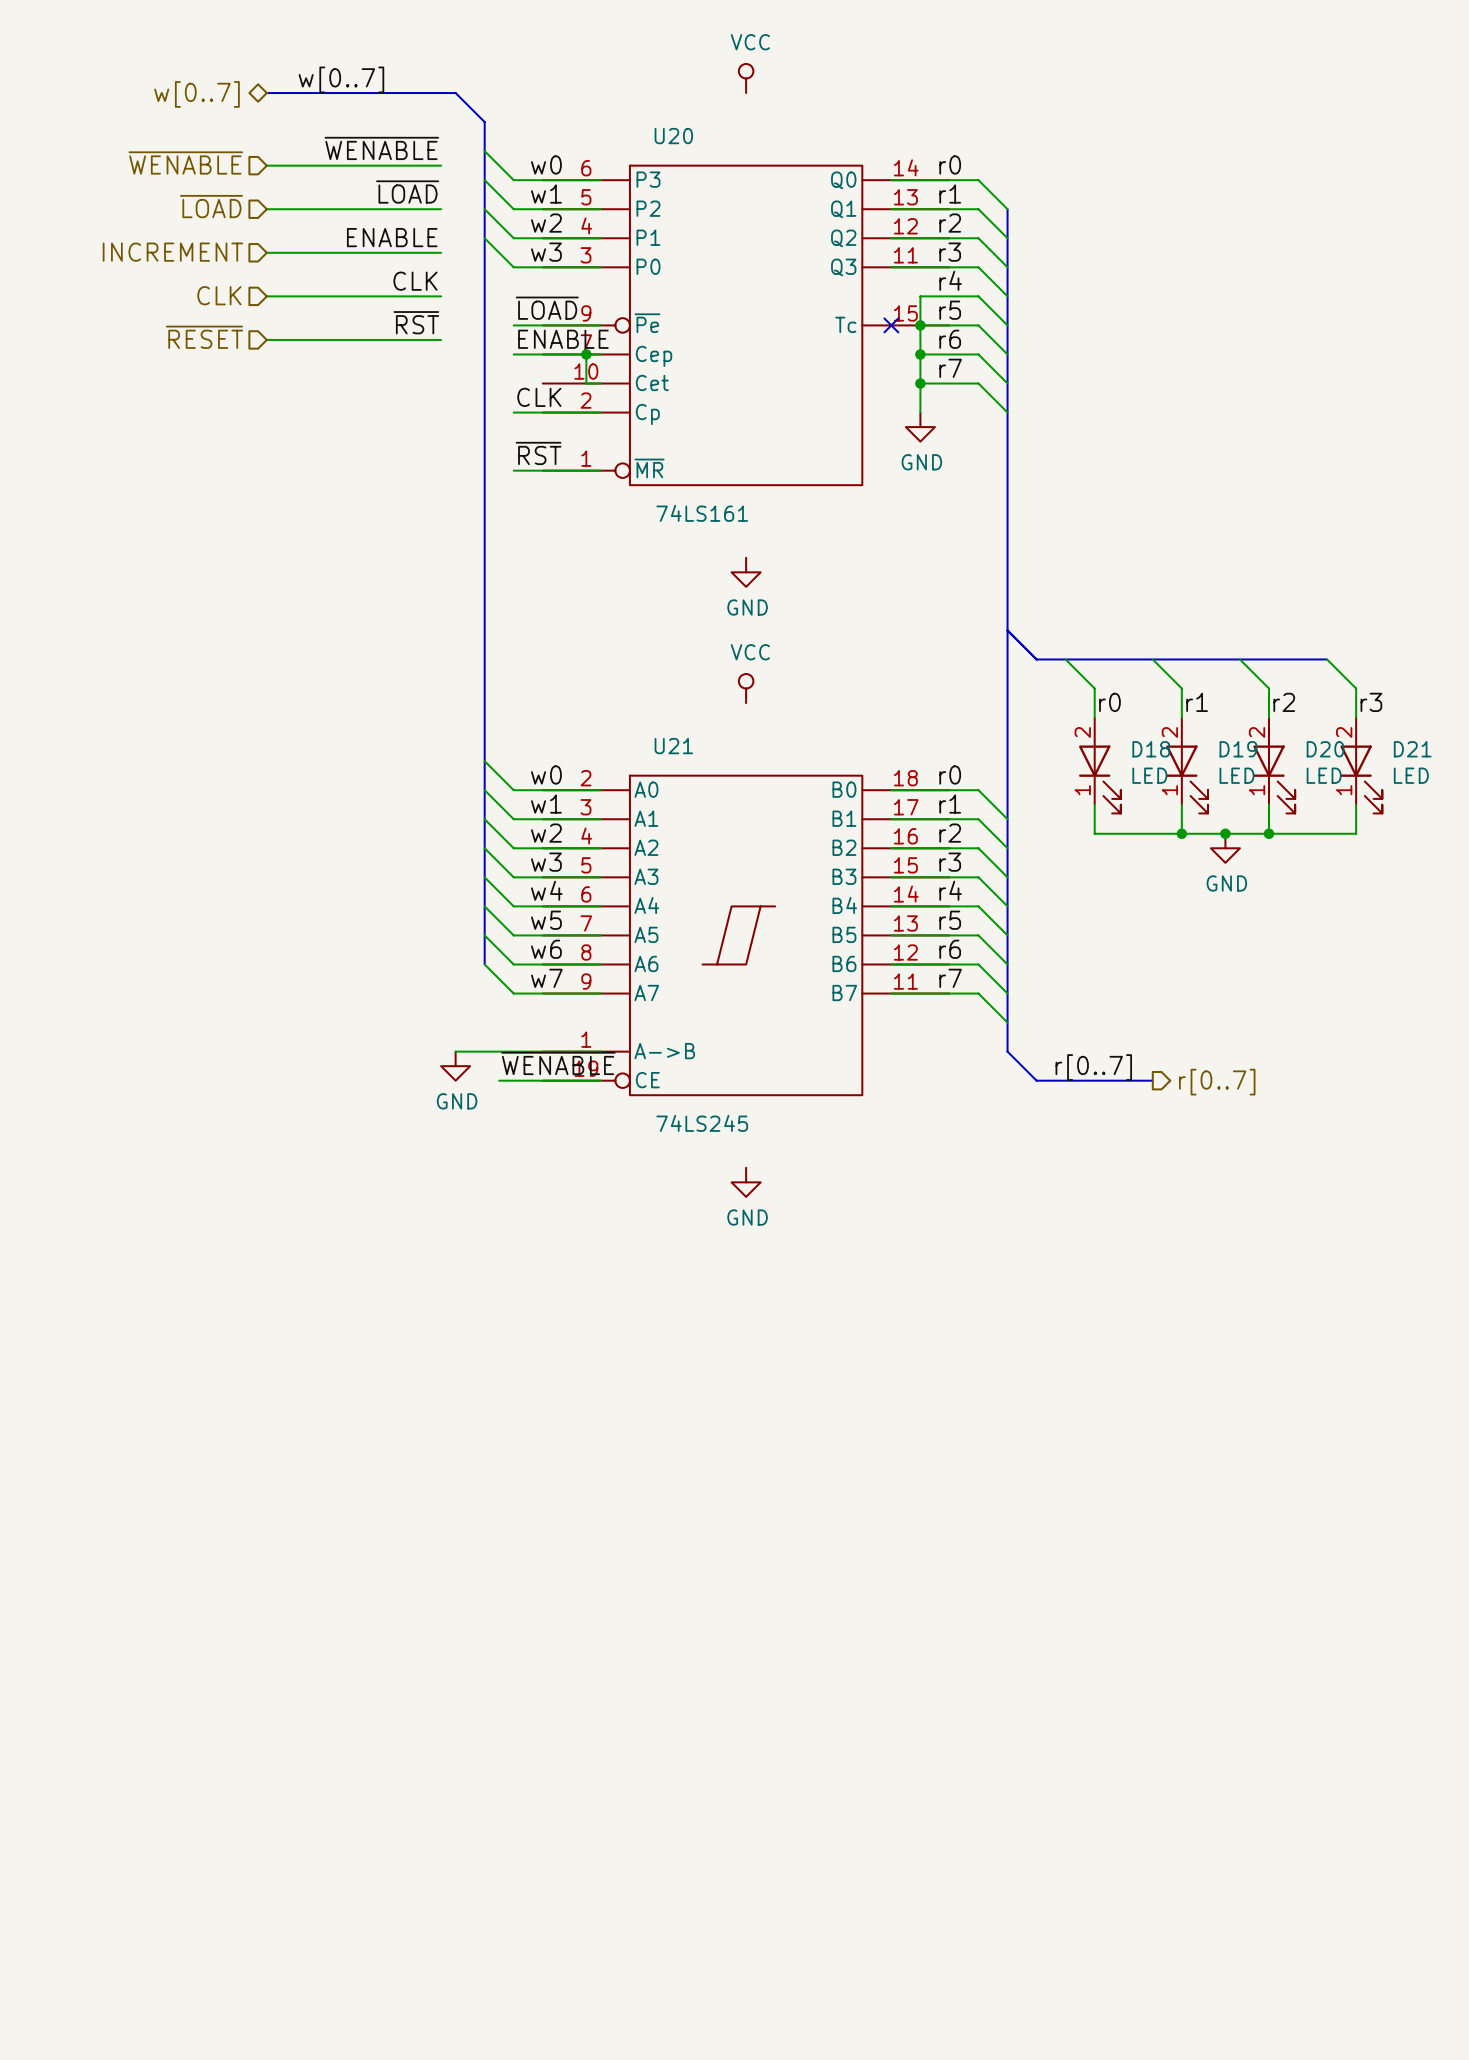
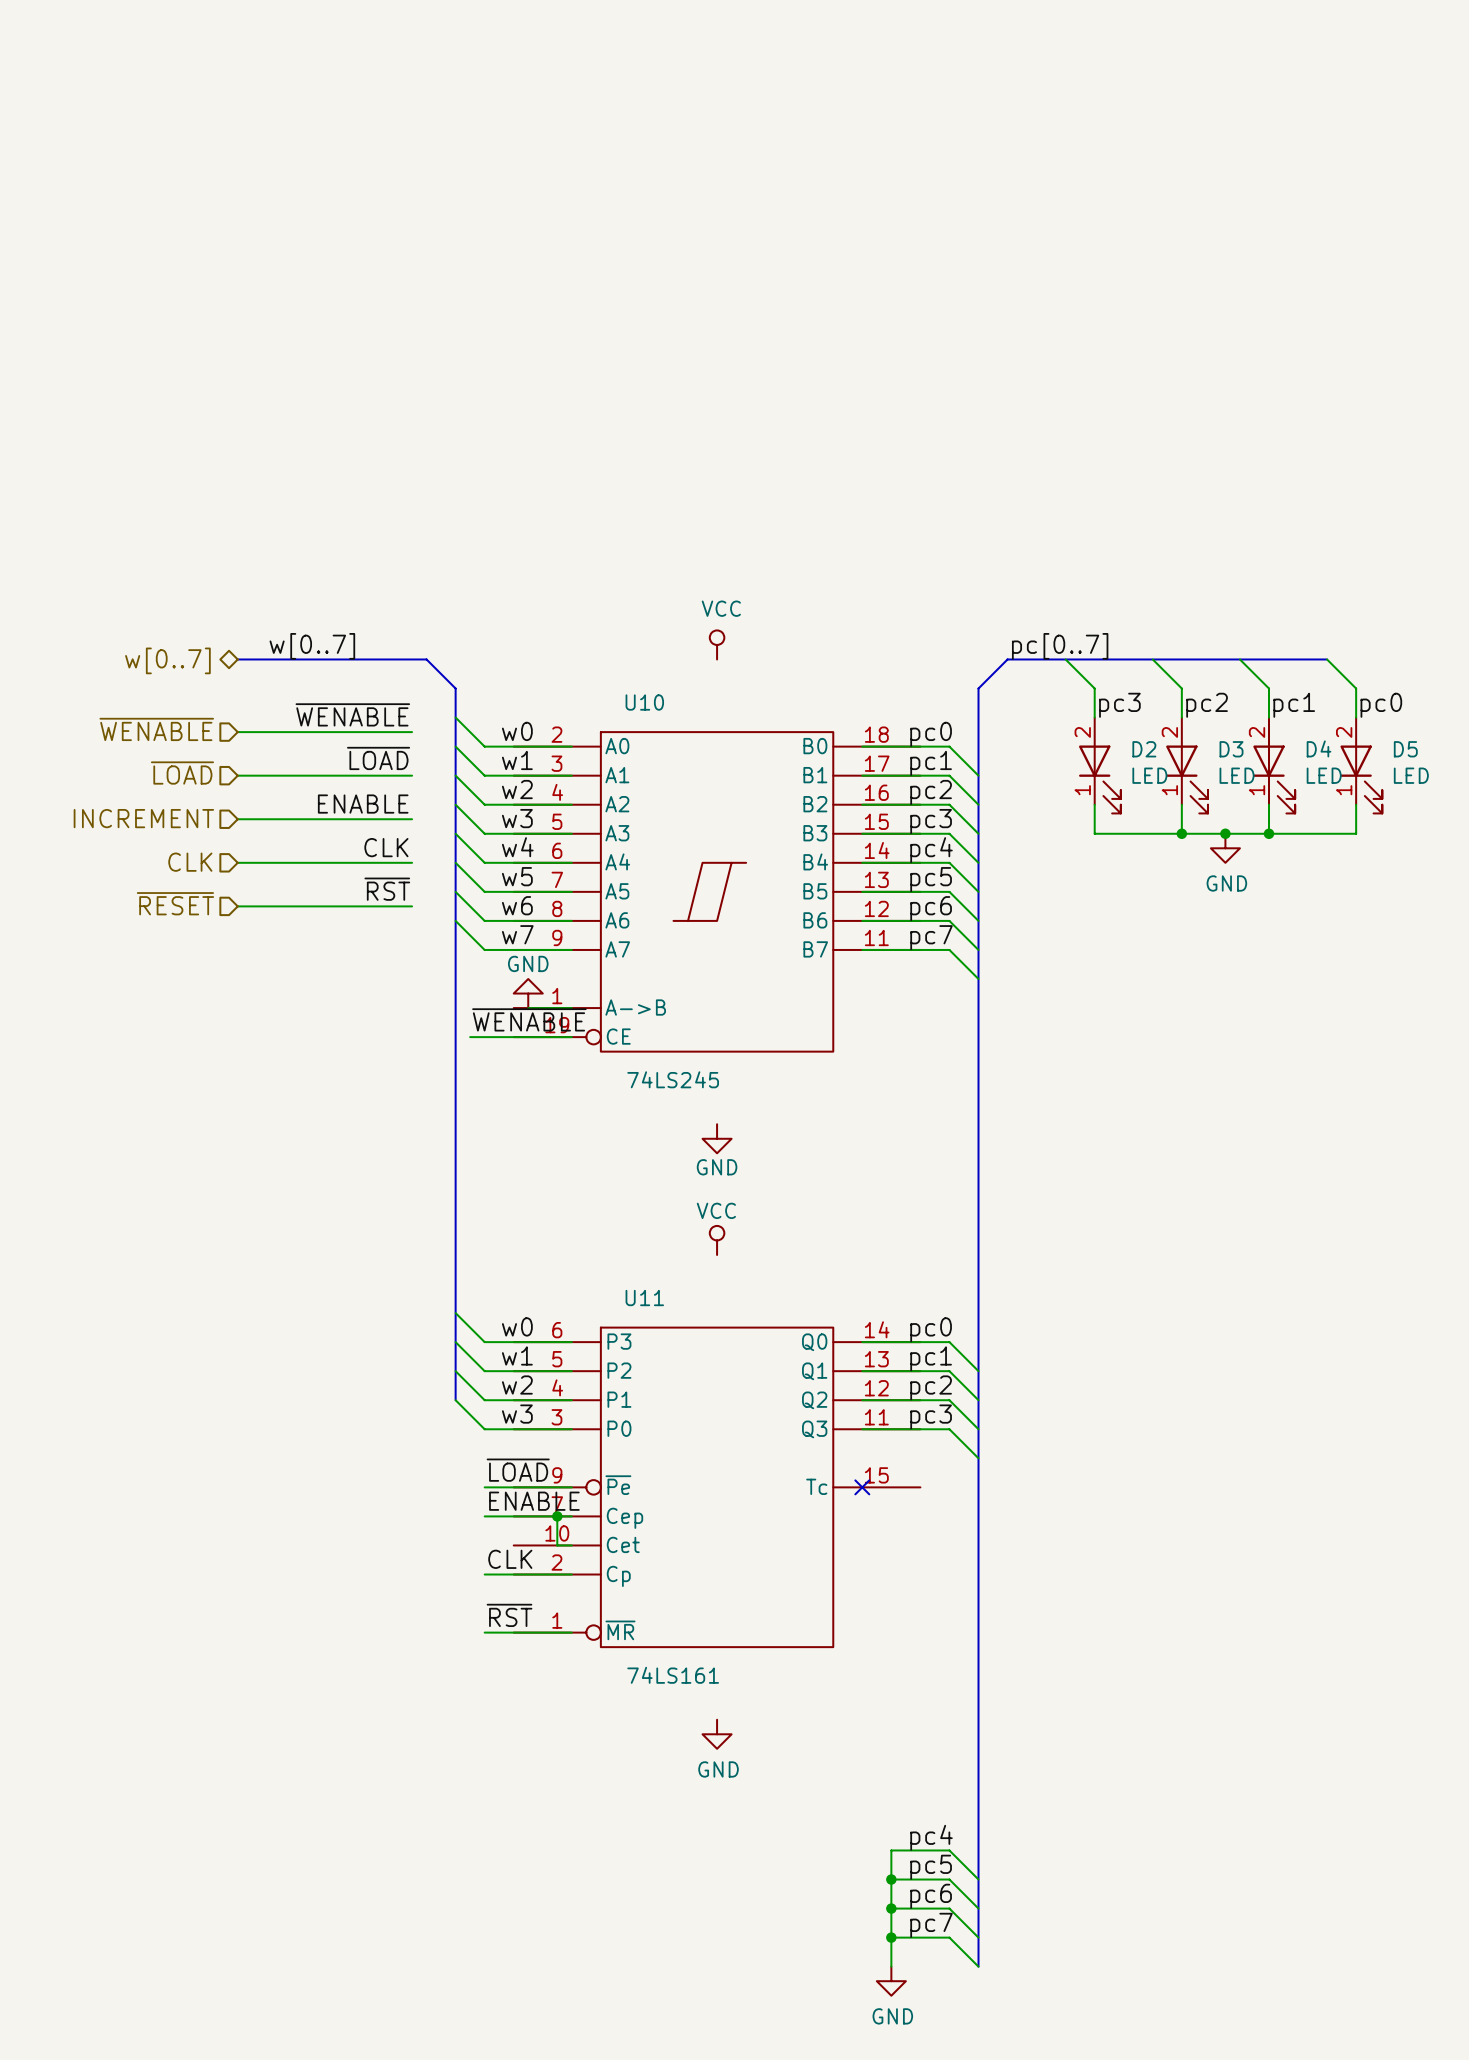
power symbol: VCC (746, 78) -> none
label: w[0..7] (341, 79) -> none
bus: (266, 93) (455, 93) (484, 122) (484, 964) -> none
hierarchical label: w[0..7] (196, 94) -> none
label: ~{WENABLE} (381, 148) -> none
wire: (484, 151) (513, 180) (600, 180) -> none
hierarchical label: ~{WENABLE} (185, 163) -> none
label: w0 (546, 164) -> none
label: r0 (950, 164) -> none
wire: (266, 165) (441, 165) -> none
wire: (484, 180) (513, 209) (600, 209) -> none
wire: (891, 180) (978, 180) (1007, 209) -> none
label: ~{LOAD} (407, 192) -> none
label: w1 (546, 194) -> none
label: r1 (950, 194) -> none
hierarchical label: ~{LOAD} (211, 206) -> none
wire: (266, 209) (441, 209) -> none
wire: (484, 209) (513, 238) (600, 238) -> none
wire: (891, 209) (978, 209) (1007, 238) -> none
bus: (1007, 209) (1007, 1051) (1036, 1080) (1152, 1080) -> none
label: w2 (546, 223) -> none
label: r2 (950, 223) -> none
label: ENABLE (392, 237) -> none
wire: (484, 238) (513, 267) (600, 267) -> none
wire: (891, 238) (978, 238) (1007, 267) -> none
hierarchical label: INCREMENT (172, 252) -> none
wire: (266, 252) (441, 252) -> none
label: w3 (546, 252) -> none
label: r3 (950, 252) -> none
wire: (891, 267) (978, 267) (1007, 296) -> none
label: r4 (950, 280) -> none
label: CLK (415, 281) -> none
hierarchical label: CLK (219, 295) -> none
wire: (266, 296) (441, 296) -> none
label: ~{LOAD} (547, 308) -> none
label: r5 (950, 310) -> none
label: ~{RST} (416, 322) -> none
wire: (513, 325) (600, 325) -> none
U20: 74LS161 (746, 325) -> none
no-connect mark: (891, 325) -> none
wire: (920, 325) (978, 325) (1007, 354) -> none
junction: (920, 325) -> none
wire: (1007, 325) (978, 296) (920, 296) (920, 412) -> none
hierarchical label: ~{RESET} (204, 337) -> none
wire: (266, 339) (441, 339) -> none
label: ENABLE (563, 339) -> none
label: r6 (950, 339) -> none
wire: (513, 354) (600, 354) -> none
wire: (586, 354) (586, 383) (600, 383) -> none
junction: (586, 354) -> none
wire: (920, 354) (978, 354) (1007, 383) -> none
junction: (920, 354) -> none
label: r7 (950, 368) -> none
wire: (920, 383) (978, 383) (1007, 412) -> none
junction: (920, 383) -> none
label: CLK (539, 397) -> none
wire: (513, 412) (600, 412) -> none
power symbol: GND (920, 427) -> none
label: ~{RST} (538, 453) -> none
wire: (513, 470) (600, 470) -> none
power symbol: GND (746, 572) -> none
bus: (1007, 630) (1036, 659) -> (978, 1966) (978, 688) (1007, 659) (1036, 659)
label: none -> w[0..7] (312, 646)
label: none -> pc[0..7] (1060, 646)
bus: none -> (237, 659) (426, 659) (455, 688) (455, 1400)
hierarchical label: none -> w[0..7] (167, 660)
power symbol position: VCC (746, 688) -> VCC (717, 644)
label: r0 (1109, 702) -> pc3 (1119, 705)
label: r1 (1197, 702) -> pc2 (1207, 705)
label: r2 (1284, 702) -> pc1 (1294, 705)
label: r3 (1371, 702) -> pc0 (1381, 705)
label: none -> ~{WENABLE} (352, 714)
hierarchical label: none -> ~{WENABLE} (156, 729)
wire: none -> (237, 732) (412, 732)
label: none -> pc0 (931, 734)
D18 name: D18 (1151, 749) -> D2 (1144, 749)
D19 name: D19 (1238, 749) -> D3 (1231, 749)
D20 name: D20 (1325, 749) -> D4 (1318, 748)
D21 name: D21 (1412, 749) -> D5 (1405, 749)
label: none -> ~{LOAD} (378, 758)
wire: (484, 761) (513, 790) (600, 790) -> (455, 717) (484, 746) (571, 746)
label: none -> pc1 (931, 763)
hierarchical label: none -> ~{LOAD} (182, 773)
label position: w0 (546, 774) -> w0 (517, 731)
label: r0 (950, 774) -> none
wire: none -> (237, 775) (412, 775)
wire: (484, 790) (513, 819) (600, 819) -> (455, 746) (484, 775) (571, 775)
wire: (891, 790) (978, 790) (1007, 819) -> (862, 746) (949, 746) (978, 775)
label: none -> pc2 (931, 792)
label: none -> ENABLE (363, 804)
label position: w1 (546, 804) -> w1 (517, 760)
label: r1 (950, 804) -> none
hierarchical label: none -> INCREMENT (143, 818)
wire: none -> (237, 819) (412, 819)
wire: (484, 819) (513, 848) (600, 848) -> (455, 775) (484, 804) (571, 804)
wire: (891, 819) (978, 819) (1007, 848) -> (862, 775) (949, 775) (978, 804)
label: none -> pc3 (931, 821)
label position: w2 (546, 833) -> w2 (517, 789)
label: r2 (950, 833) -> none
label: none -> CLK (386, 847)
wire: (484, 848) (513, 877) (600, 877) -> (455, 804) (484, 833) (571, 833)
wire: (891, 848) (978, 848) (1007, 877) -> (862, 804) (949, 804) (978, 833)
label: none -> pc4 (931, 850)
hierarchical label: none -> CLK (190, 862)
wire: none -> (237, 862) (412, 862)
label position: w3 (546, 862) -> w3 (517, 818)
label: r3 (950, 862) -> none
wire: (484, 877) (513, 906) (600, 906) -> (455, 833) (484, 862) (571, 862)
wire: (891, 877) (978, 877) (1007, 906) -> (862, 833) (949, 833) (978, 862)
label: none -> pc5 (931, 879)
label: none -> ~{RST} (387, 889)
label position: w4 (546, 890) -> w4 (517, 847)
label: r4 (950, 890) -> none
U10: none -> 74LS245 (717, 891)
hierarchical label: none -> ~{RESET} (175, 903)
wire: none -> (237, 906) (412, 906)
wire: (484, 906) (513, 935) (600, 935) -> (455, 862) (484, 891) (571, 891)
wire: (891, 906) (978, 906) (1007, 935) -> (862, 862) (949, 862) (978, 891)
label: none -> pc6 (931, 908)
label position: w5 (546, 920) -> w5 (517, 876)
label: r5 (950, 920) -> none
wire: (484, 935) (513, 964) (600, 964) -> (455, 891) (484, 920) (571, 920)
U21: 74LS245 (746, 935) -> none
wire: (891, 935) (978, 935) (1007, 964) -> (862, 891) (949, 891) (978, 920)
label: none -> pc7 (931, 937)
label position: w6 (546, 949) -> w6 (517, 905)
label: r6 (950, 949) -> none
wire: (484, 964) (513, 993) (600, 993) -> (455, 920) (484, 949) (571, 949)
wire: (891, 964) (978, 964) (1007, 993) -> (862, 920) (949, 920) (978, 949)
label position: w7 (546, 978) -> w7 (517, 934)
label: r7 (950, 978) -> none
wire: (891, 993) (978, 993) (1007, 1022) -> (862, 949) (949, 949) (978, 979)
wire: none -> (528, 1008) (571, 1008)
wire: (455, 1051) (600, 1051) -> none
label position: ~{WENABLE} (558, 1063) -> ~{WENABLE} (529, 1019)
power symbol rotation: 0° (455, 1066) -> 180° (528, 993)
power symbol position: GND (455, 1066) -> GND (528, 993)
label: r[0..7] (1093, 1067) -> none
wire: (499, 1080) (600, 1080) -> (470, 1037) (571, 1037)
hierarchical label: r[0..7] (1217, 1082) -> none
power symbol position: GND (746, 1182) -> GND (717, 1138)
power symbol text position: GND (747, 1217) -> GND (717, 1167)
power symbol: none -> VCC (717, 1240)
wire: none -> (455, 1313) (484, 1342) (571, 1342)
label: none -> w0 (517, 1326)
label: none -> pc0 (931, 1329)
wire: none -> (455, 1342) (484, 1371) (571, 1371)
wire: none -> (862, 1342) (949, 1342) (978, 1371)
label: none -> w1 (517, 1355)
label: none -> pc1 (931, 1358)
wire: none -> (455, 1371) (484, 1400) (571, 1400)
wire: none -> (862, 1371) (949, 1371) (978, 1400)
label: none -> w2 (517, 1385)
label: none -> pc2 (931, 1387)
wire: none -> (455, 1400) (484, 1429) (571, 1429)
wire: none -> (862, 1400) (949, 1400) (978, 1429)
label: none -> w3 (517, 1414)
label: none -> pc3 (931, 1416)
wire: none -> (862, 1429) (949, 1429) (978, 1458)
label: none -> ~{LOAD} (518, 1470)
wire: none -> (484, 1487) (571, 1487)
U11: none -> 74LS161 (717, 1487)
no-connect mark: none -> (862, 1487)
label: none -> ENABLE (534, 1501)
wire: none -> (484, 1516) (571, 1516)
wire: none -> (557, 1516) (557, 1545) (571, 1545)
junction: none -> (557, 1516)
label: none -> CLK (510, 1559)
wire: none -> (484, 1574) (571, 1574)
label: none -> ~{RST} (509, 1615)
wire: none -> (484, 1632) (571, 1632)
power symbol: none -> GND (717, 1734)
label: none -> pc4 (931, 1837)
label: none -> pc5 (931, 1867)
wire: none -> (891, 1879) (949, 1879) (978, 1908)
junction: none -> (891, 1879)
wire: none -> (978, 1879) (949, 1850) (891, 1850) (891, 1966)
label: none -> pc6 (931, 1896)
wire: none -> (891, 1908) (949, 1908) (978, 1937)
junction: none -> (891, 1908)
label: none -> pc7 (931, 1925)
wire: none -> (891, 1937) (949, 1937) (978, 1966)
junction: none -> (891, 1937)
power symbol: none -> GND (891, 1981)

